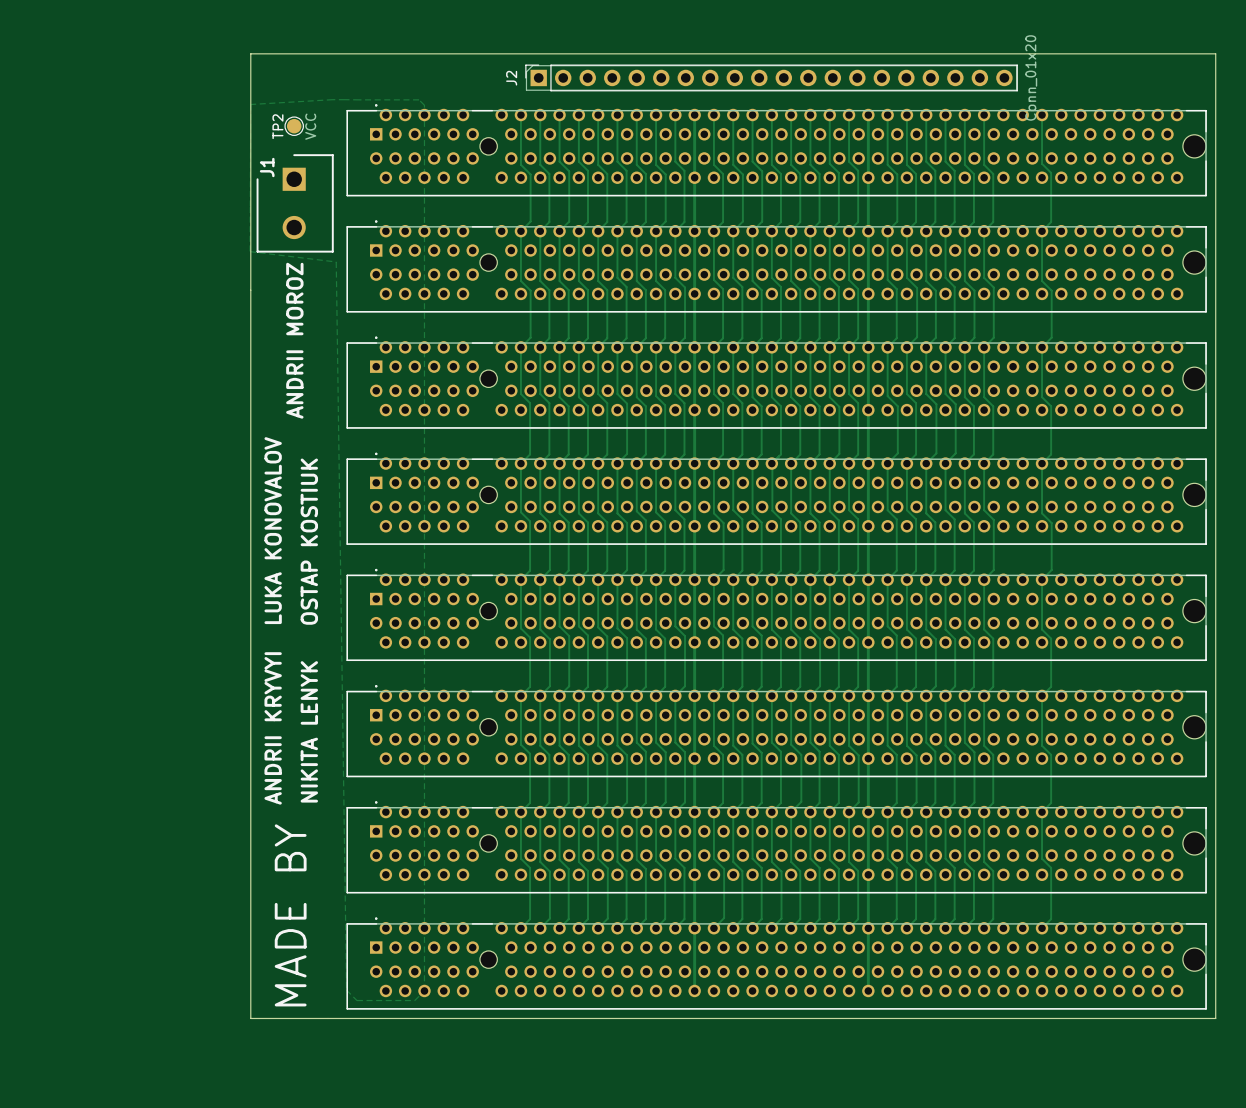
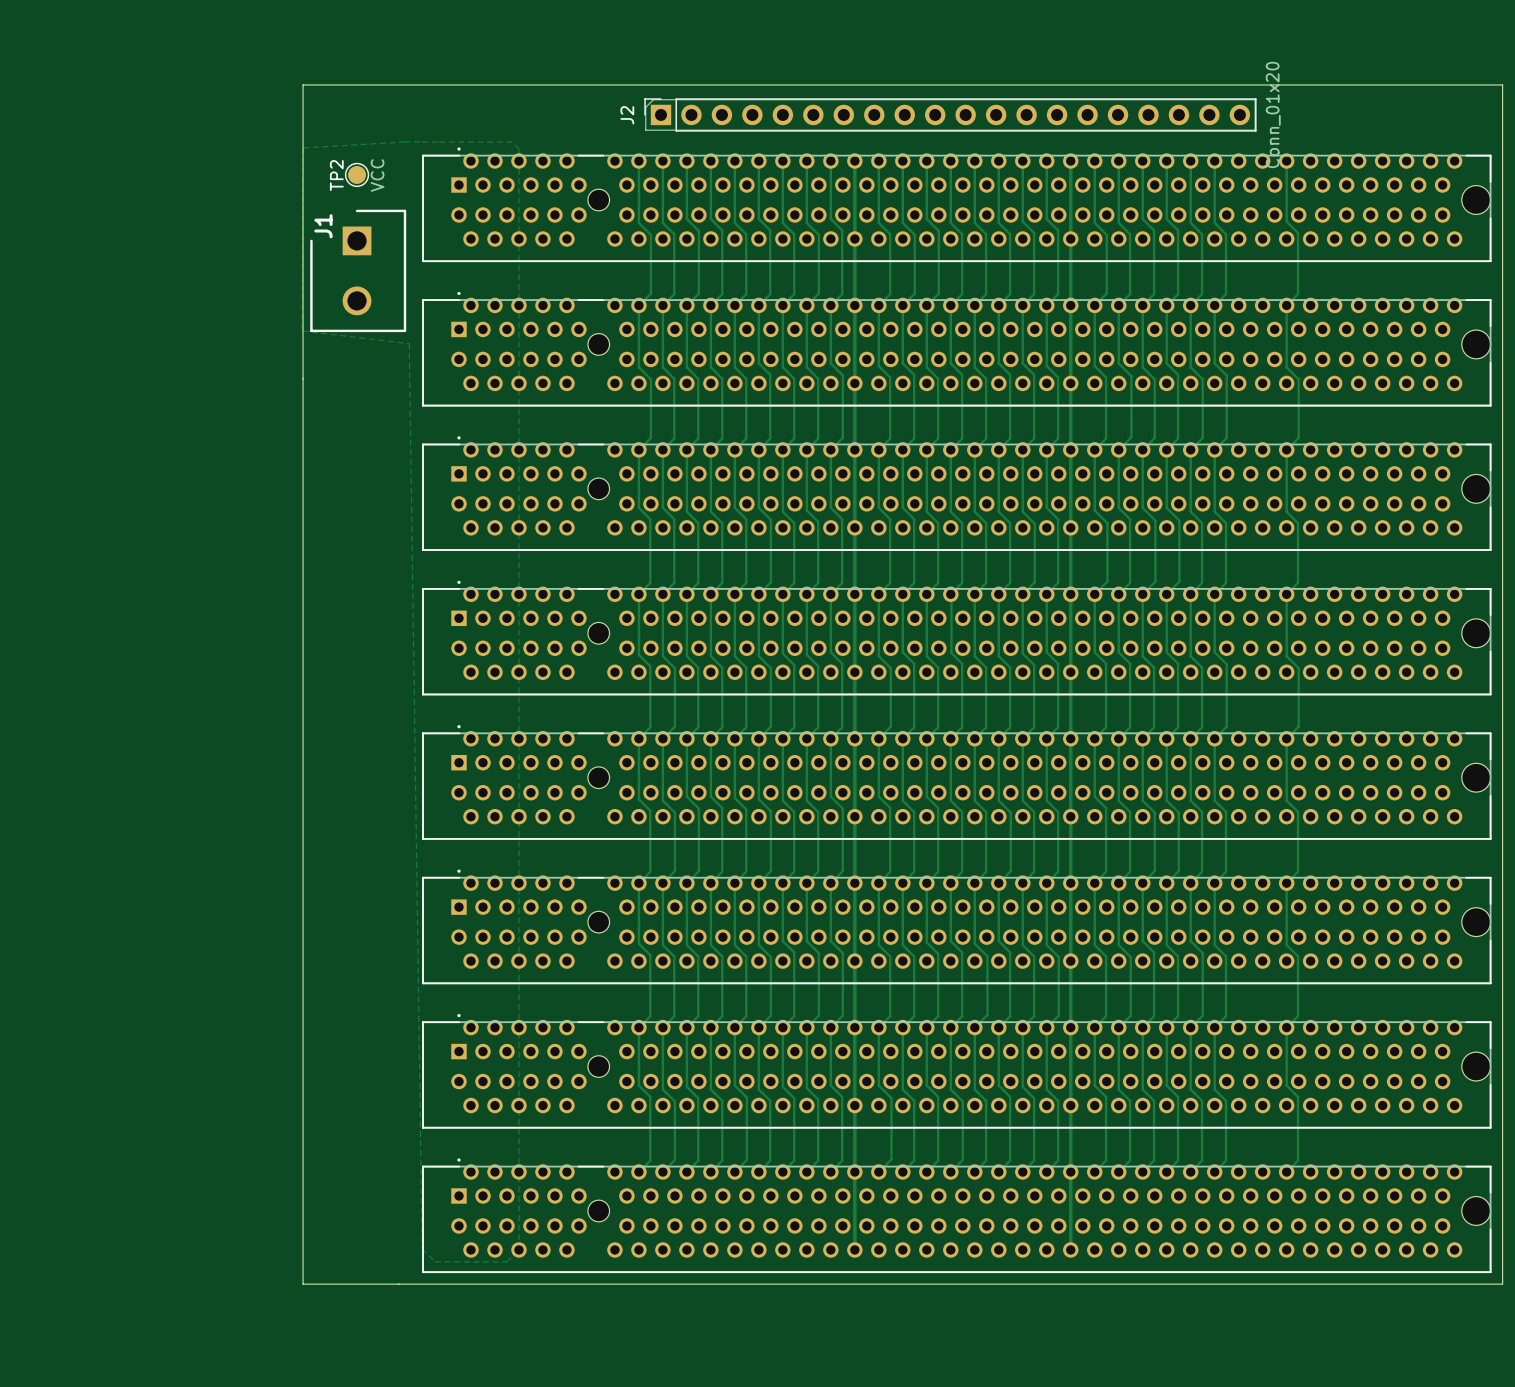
text: ANDRII MOROZ (294, 340) -> none
text: LUKA KONOVALOV (273, 530) -> none
text: OSTAP KOSTIUK (309, 541) -> none
text: ANDRII KRYVYI (273, 728) -> none
text: NIKITA LENYK (309, 731) -> none
text: MADE BY (290, 915) -> none

